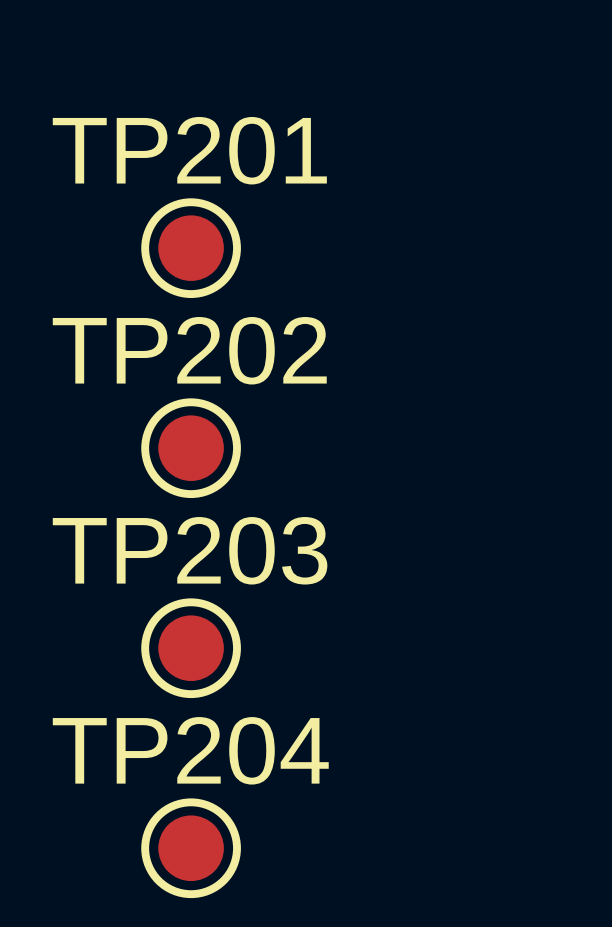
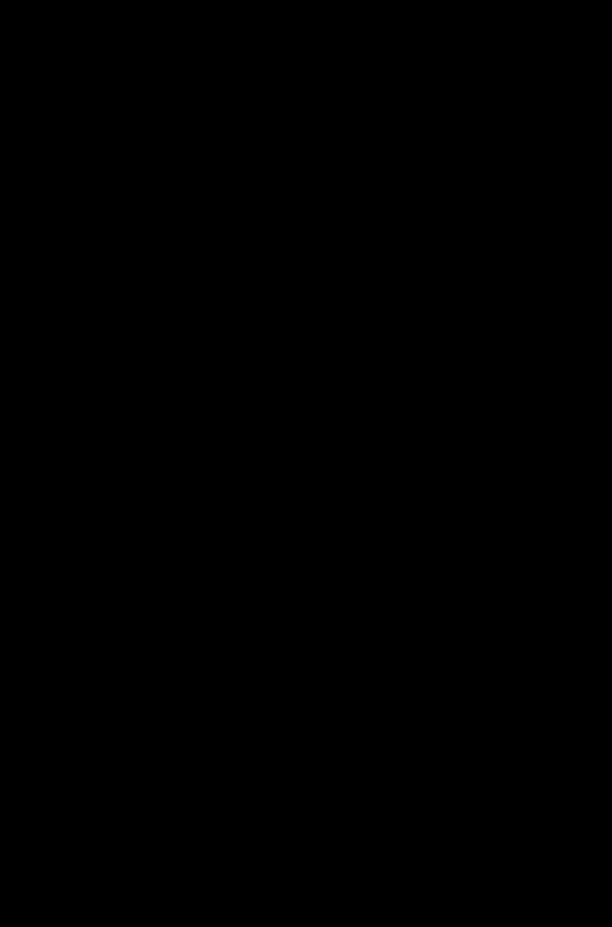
TP201: (191, 248) -> none
TP202: (191, 448) -> none
TP203: (191, 648) -> none
TP204: (191, 848) -> none

